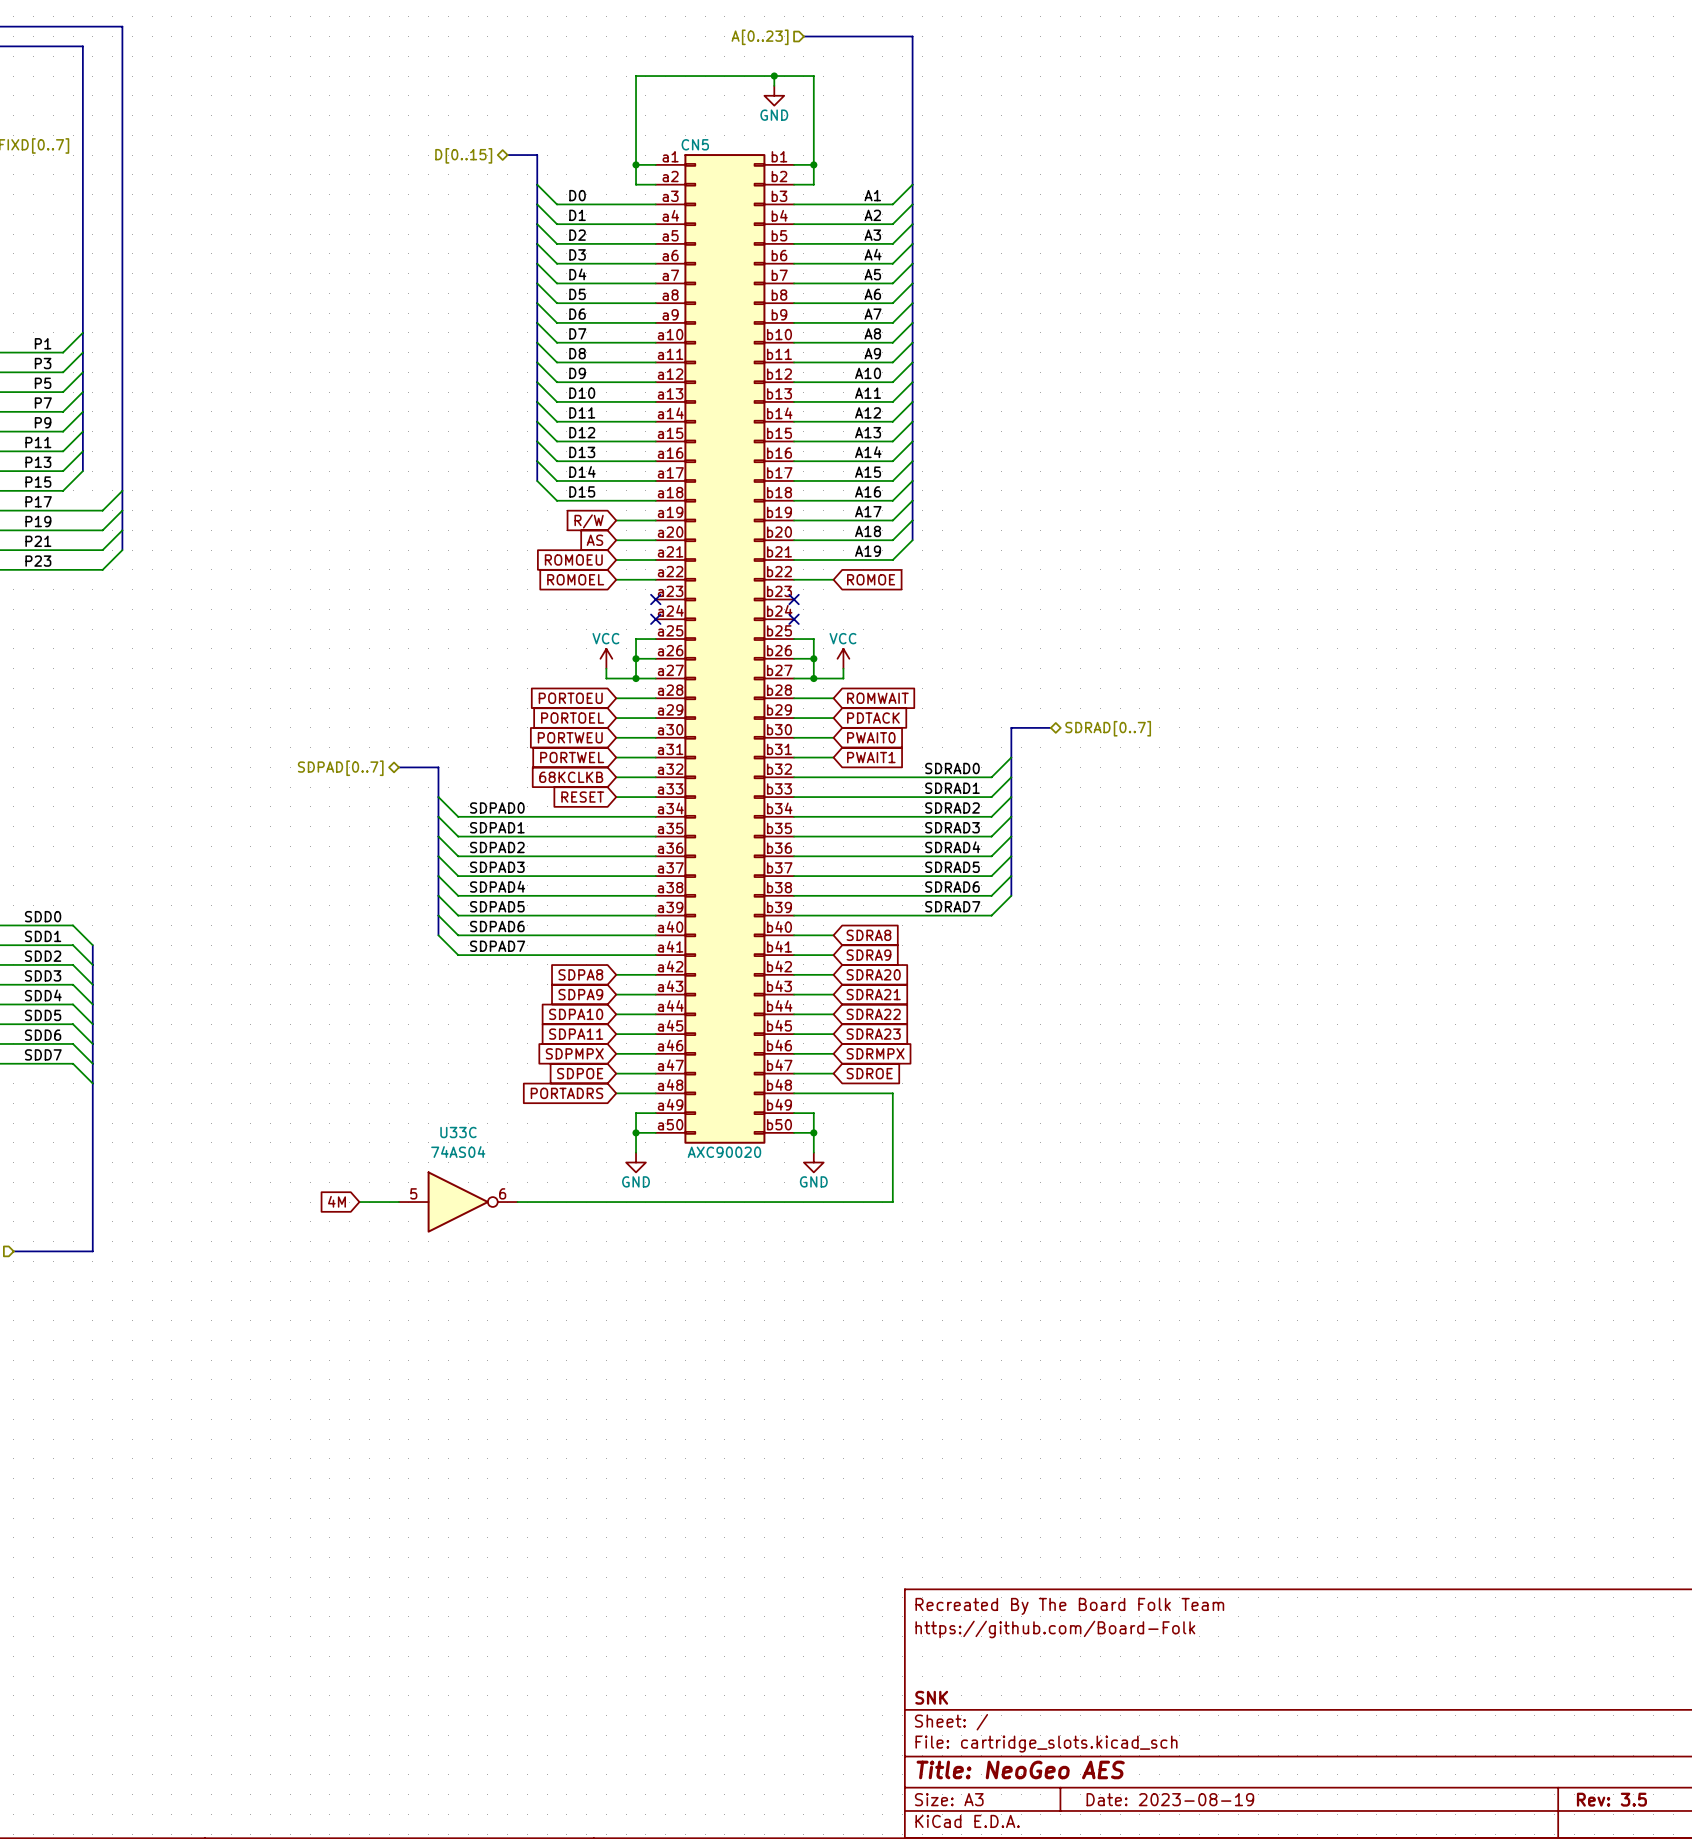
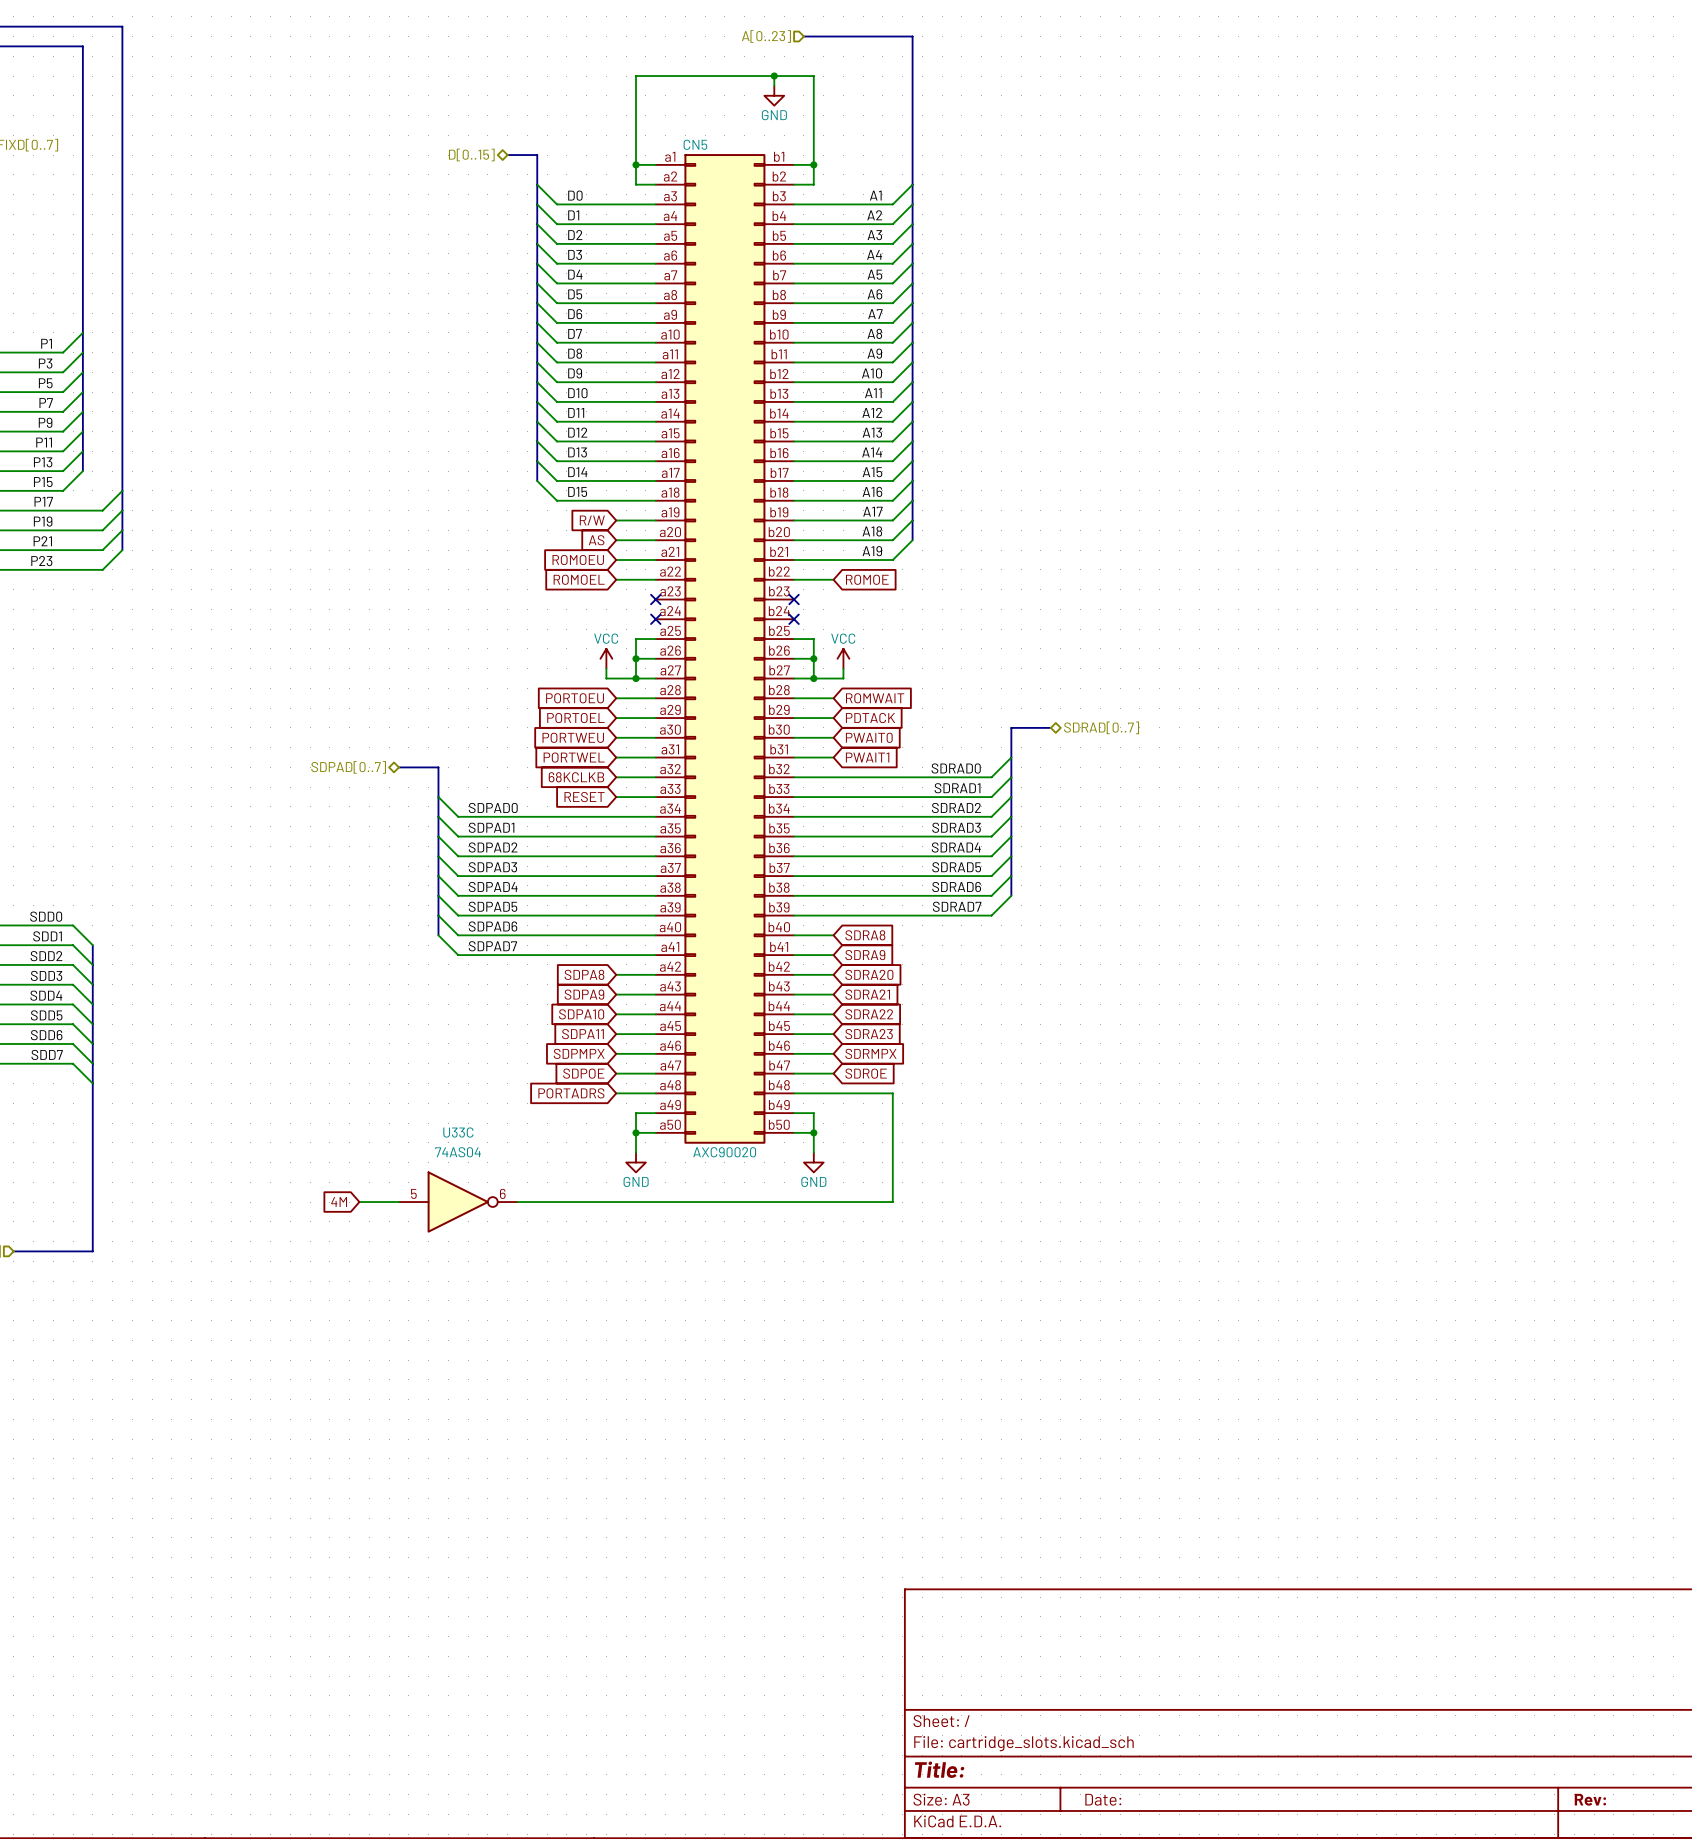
title block: Recreated By The Board Folk Team (1069, 1606) -> none
title block: https://github.com/Board-Folk (1055, 1629) -> none
title block: SNK (931, 1697) -> none
title block: Title: NeoGeo AES (1020, 1769) -> Title: (939, 1769)
title block: Date: 2023-08-19 (1170, 1799) -> Date: (1103, 1799)
title block: Rev: 3.5 (1611, 1799) -> Rev: (1590, 1799)

